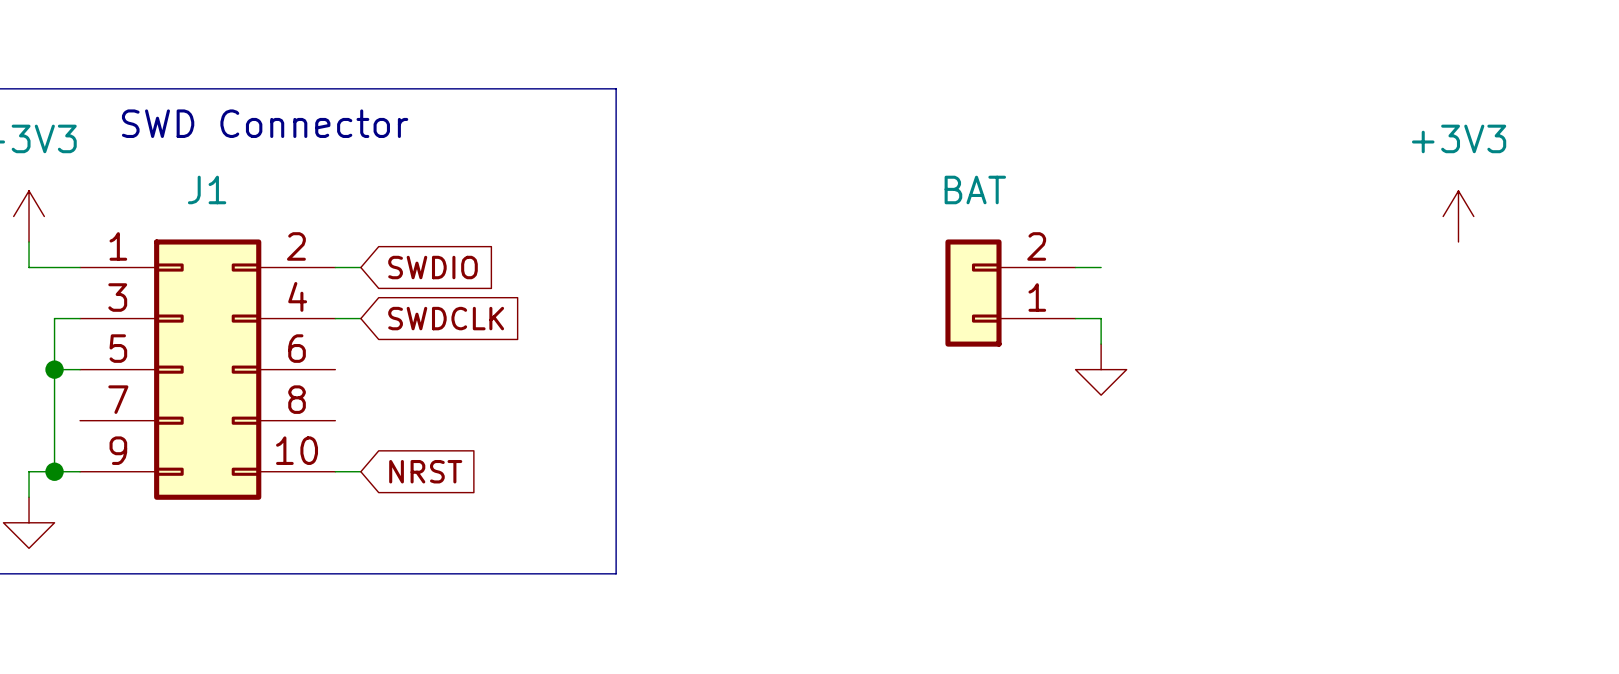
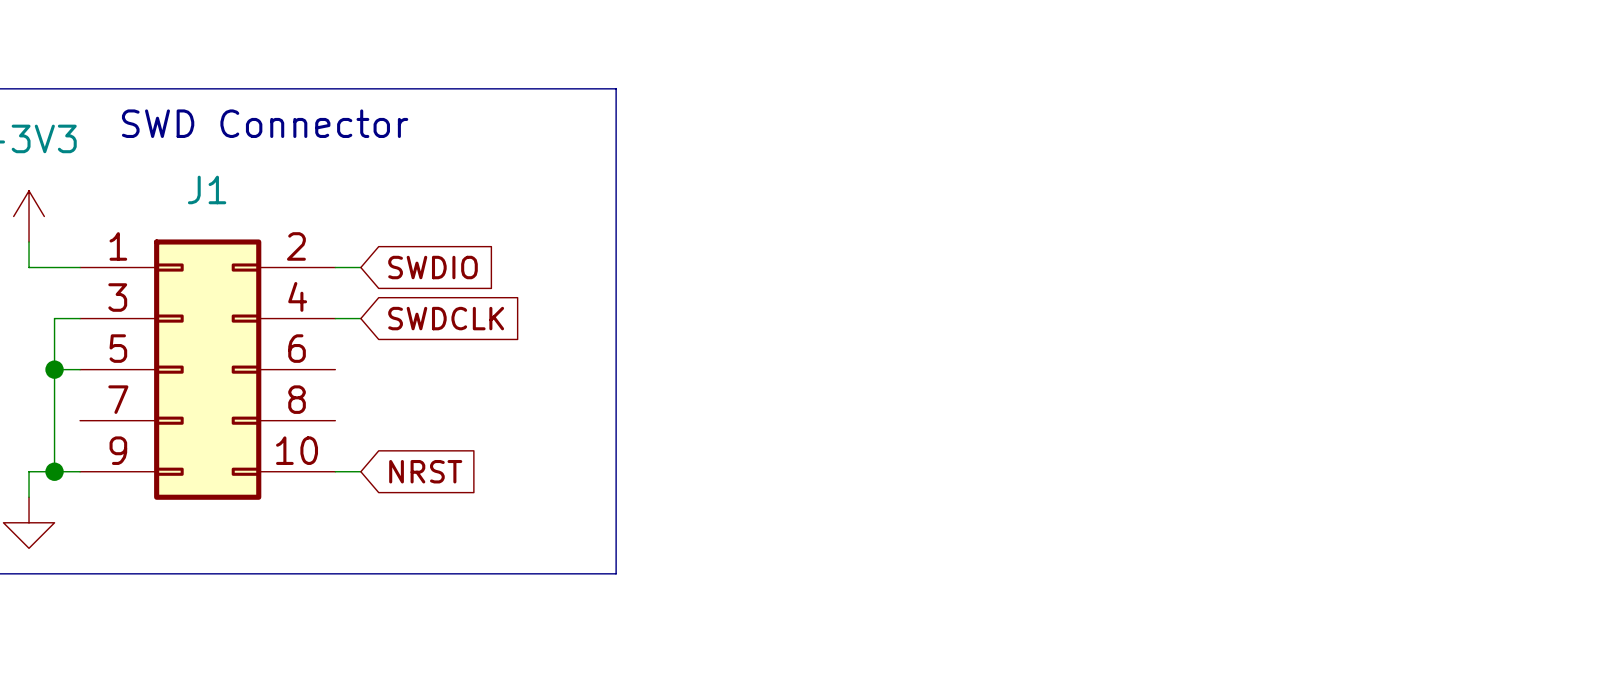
power symbol: +3V3 (1458, 216) -> none
wire: (1075, 267) (1101, 267) -> none
BAT: (1010, 293) -> none
wire: (1075, 318) (1101, 318) (1101, 344) -> none
power symbol: (1101, 369) -> none

